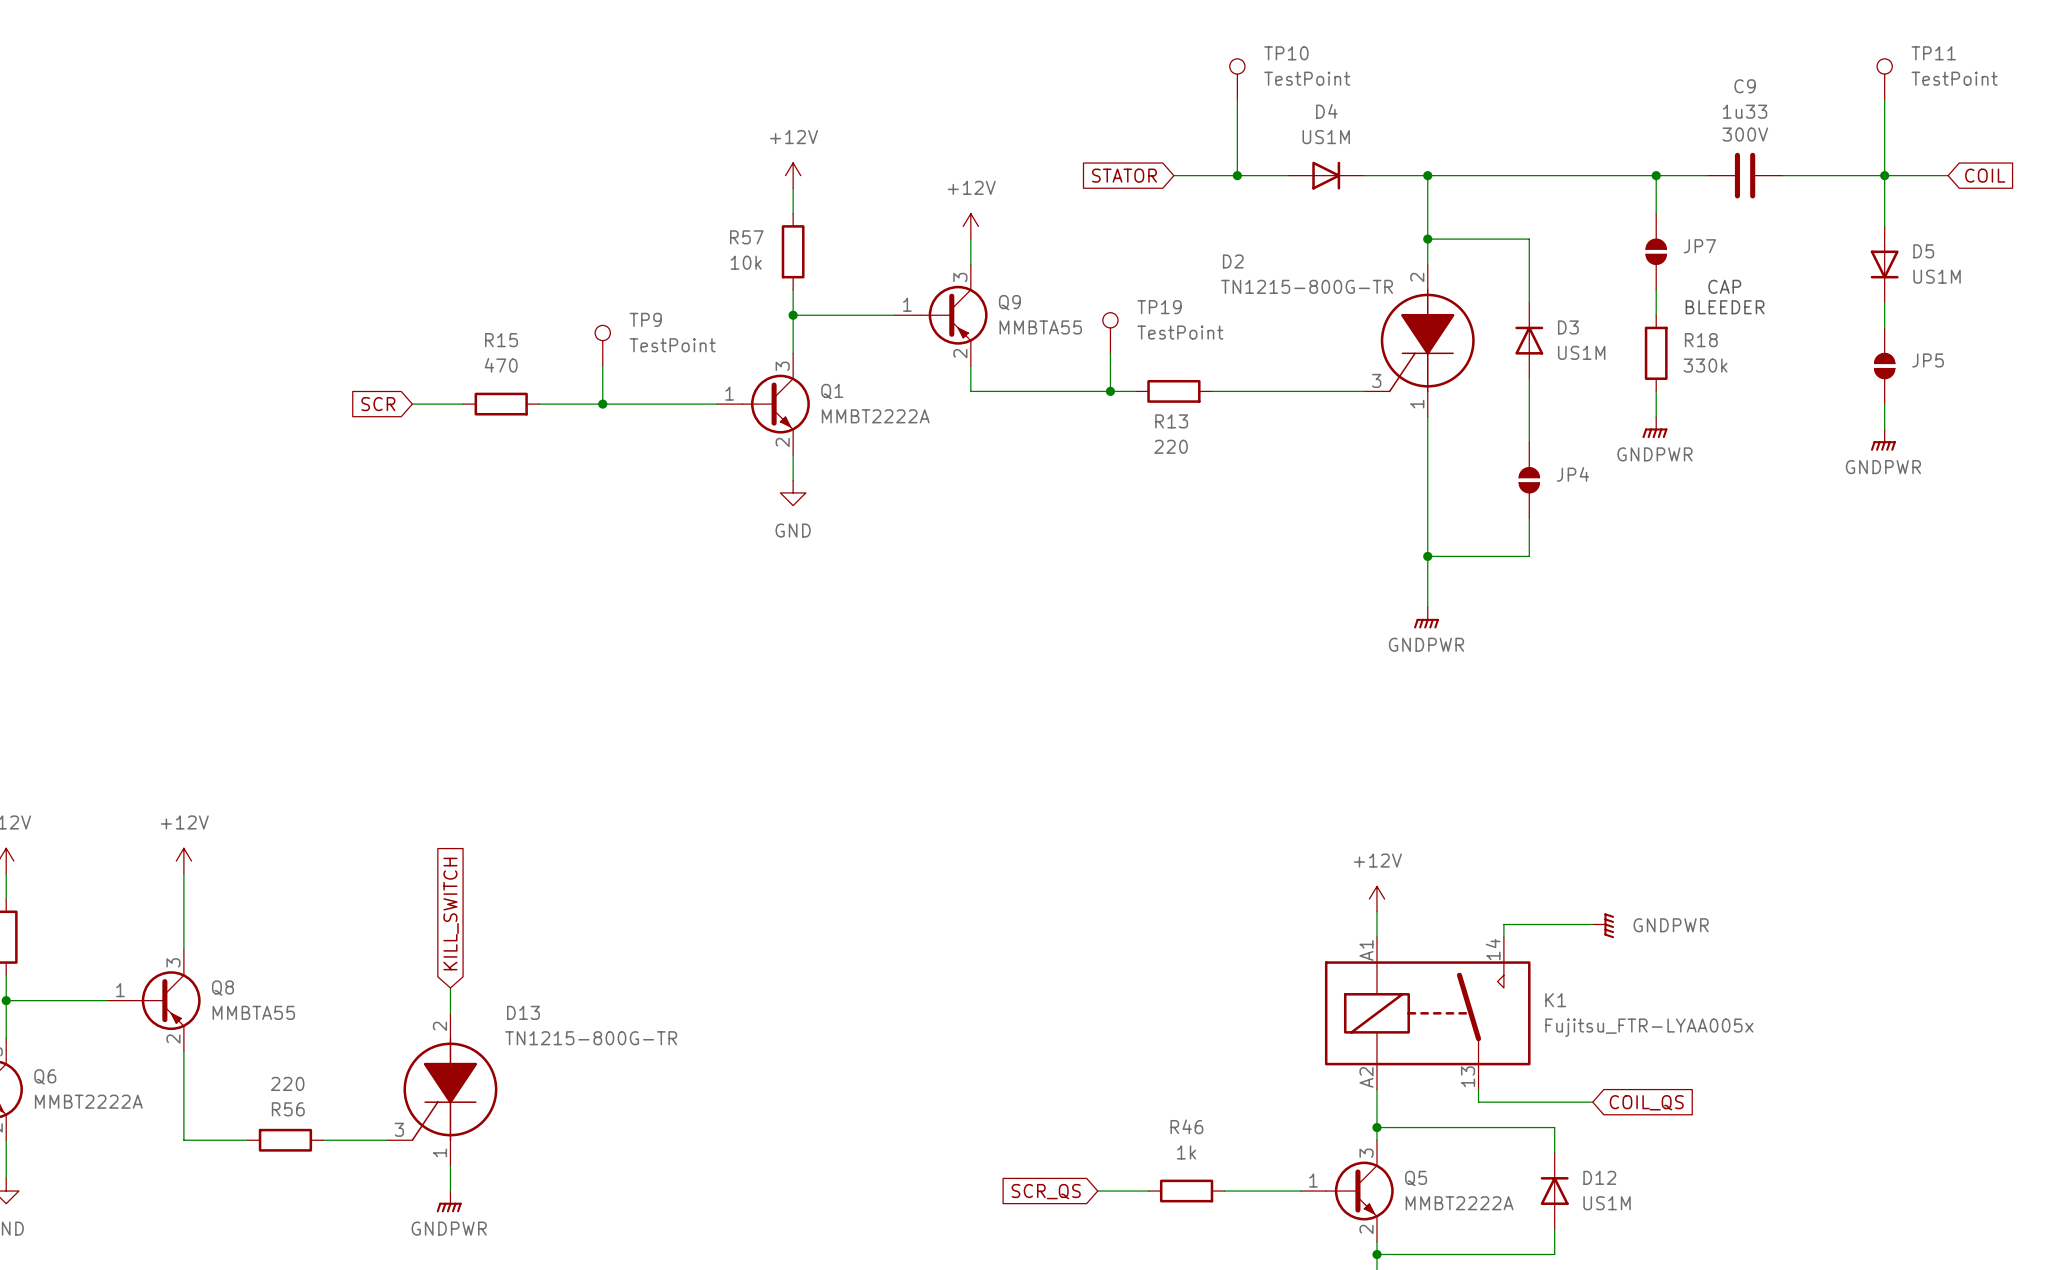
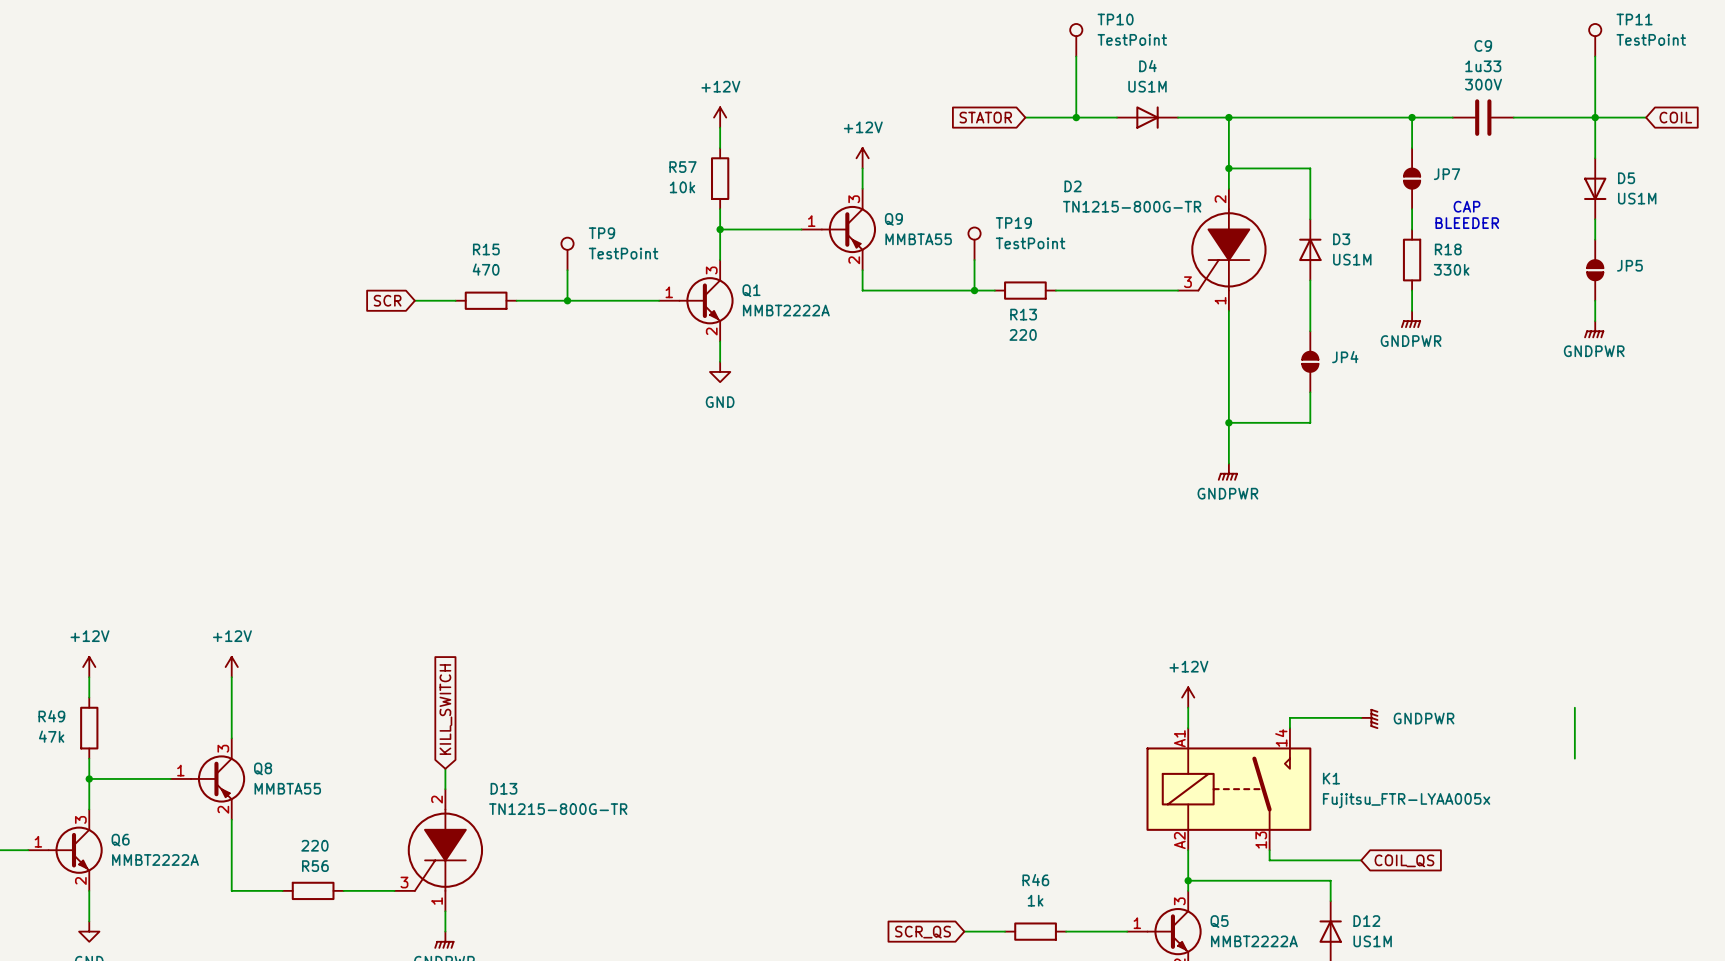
wire: none -> (1574, 707) (1574, 758)

